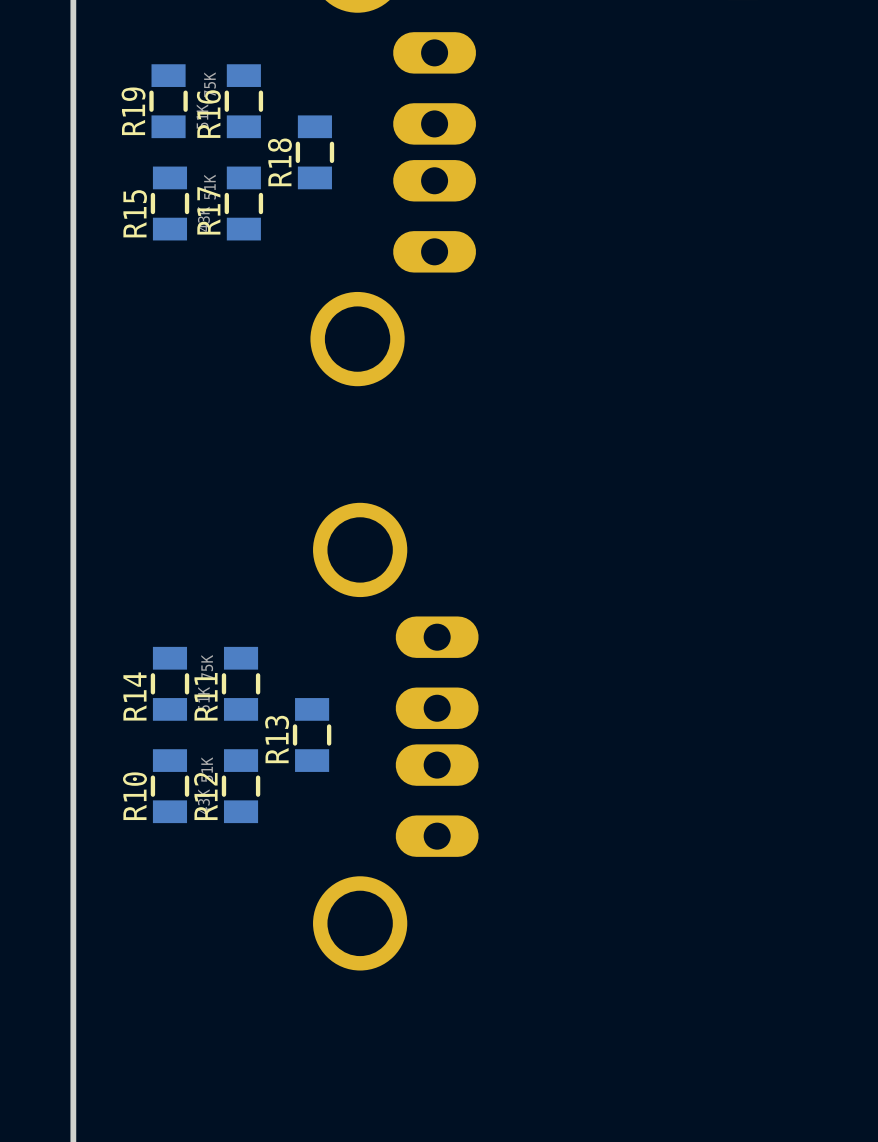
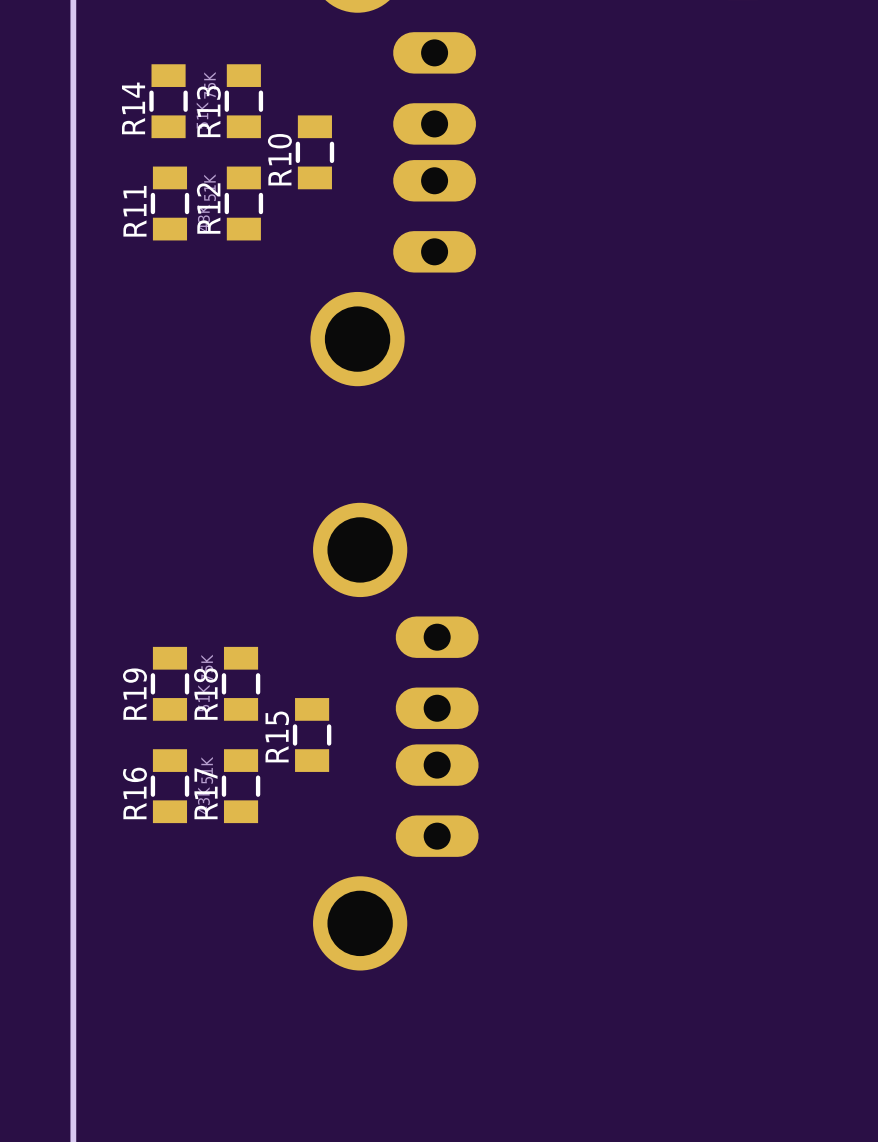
R19 name: R19 (133, 111) -> R14 (133, 108)
R16 name: R16 (208, 114) -> R13 (208, 111)
R18 name: R18 (279, 162) -> R10 (279, 159)
R17 name: R17 (208, 210) -> R12 (208, 208)
R15 name: R15 (135, 213) -> R11 (134, 211)
R14 name: R14 (134, 696) -> R19 (134, 694)
R11 name: R11 (206, 696) -> R18 (206, 694)
R13 name: R13 (277, 739) -> R15 (277, 736)
R10 name: R10 (134, 796) -> R16 (134, 793)
R12 name: R12 (205, 796) -> R17 (206, 793)

